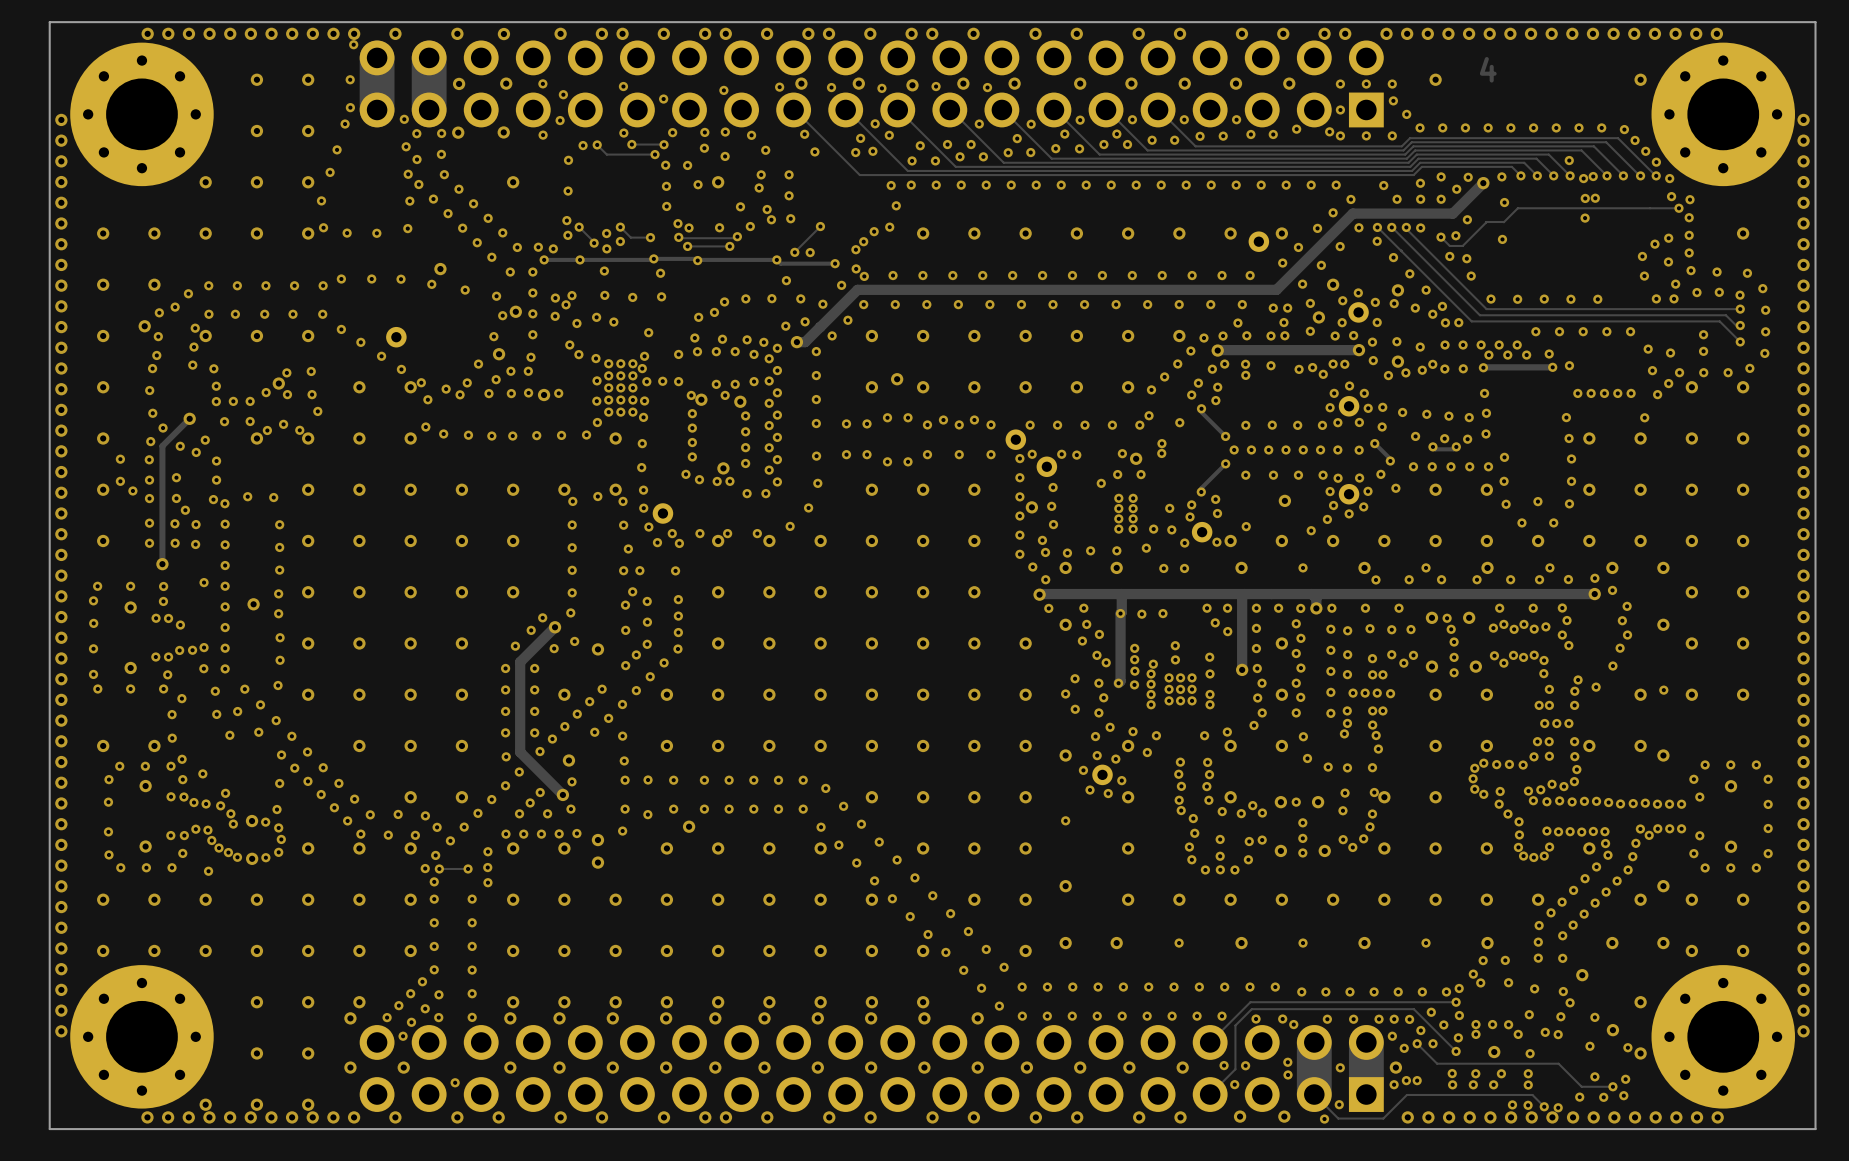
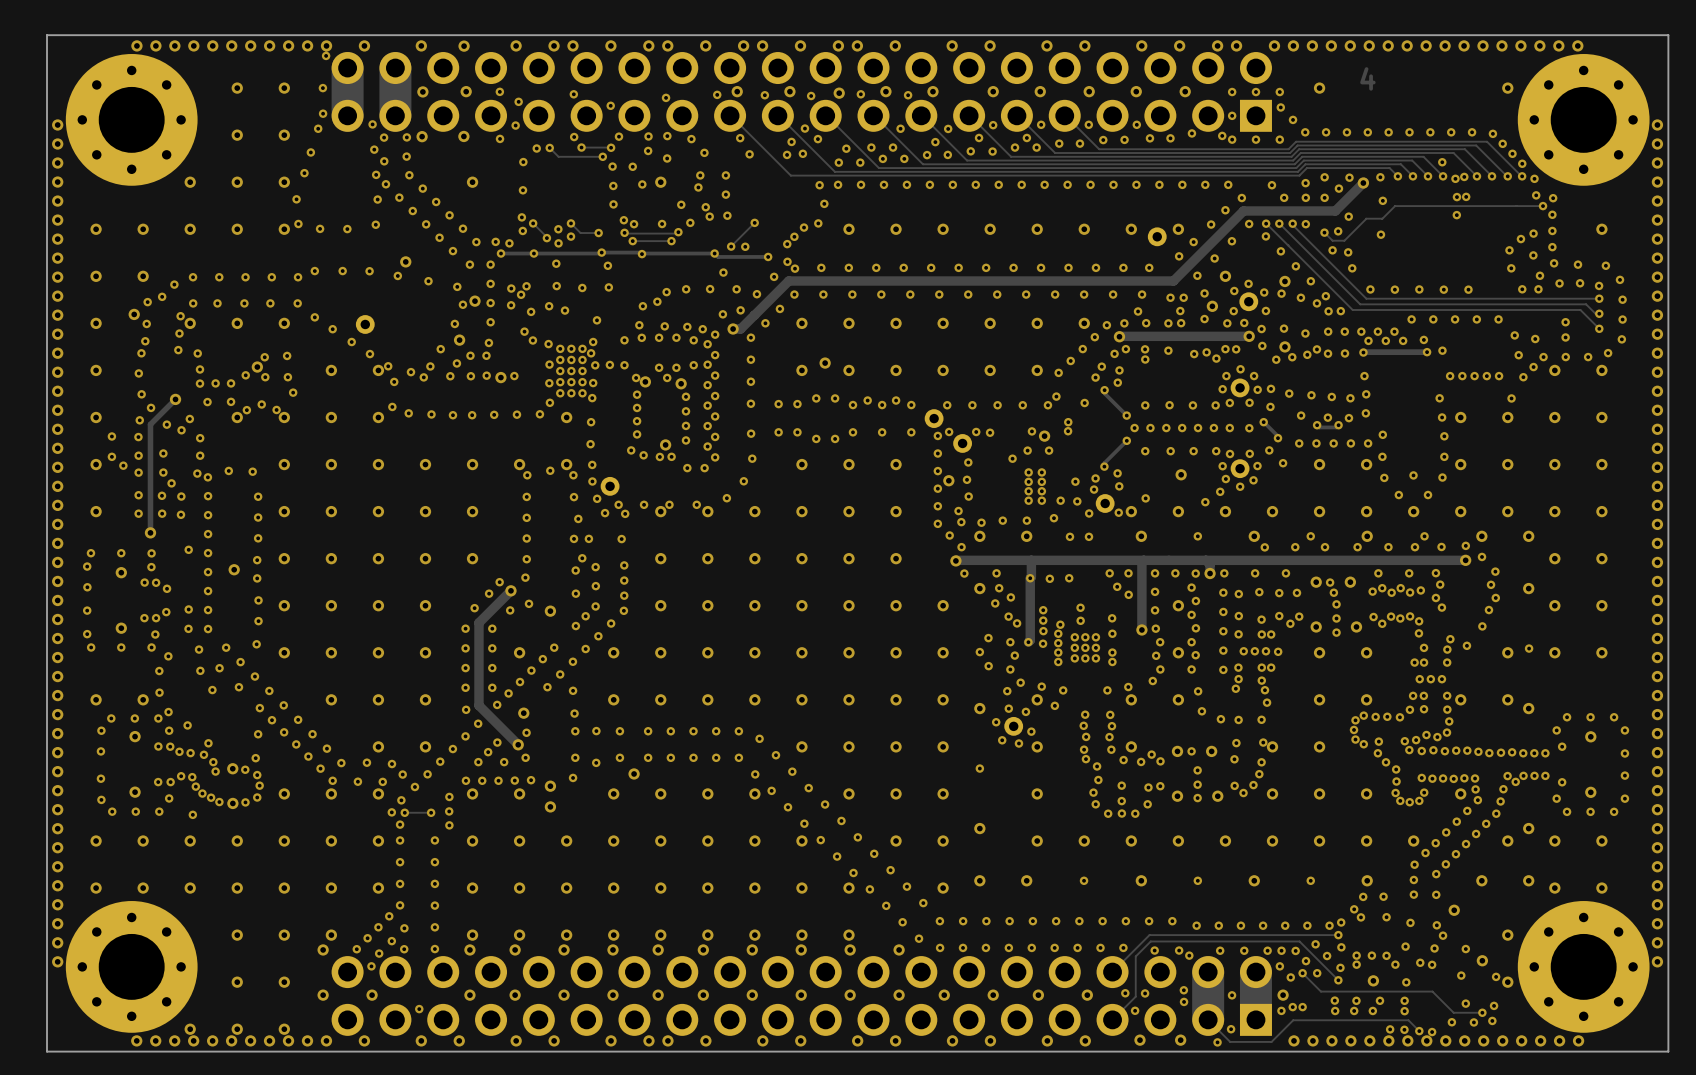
via: (192, 650) -> none

